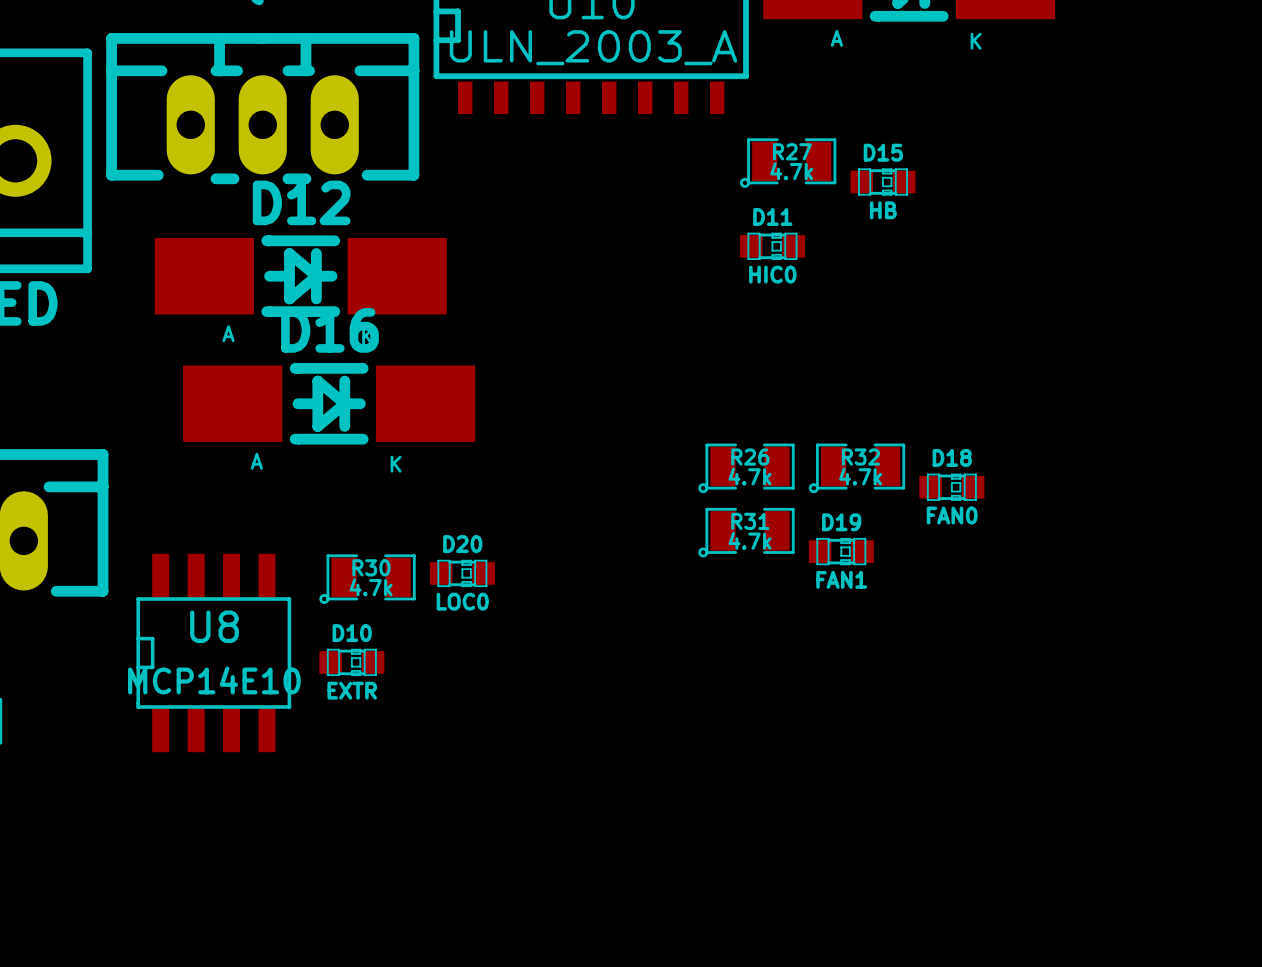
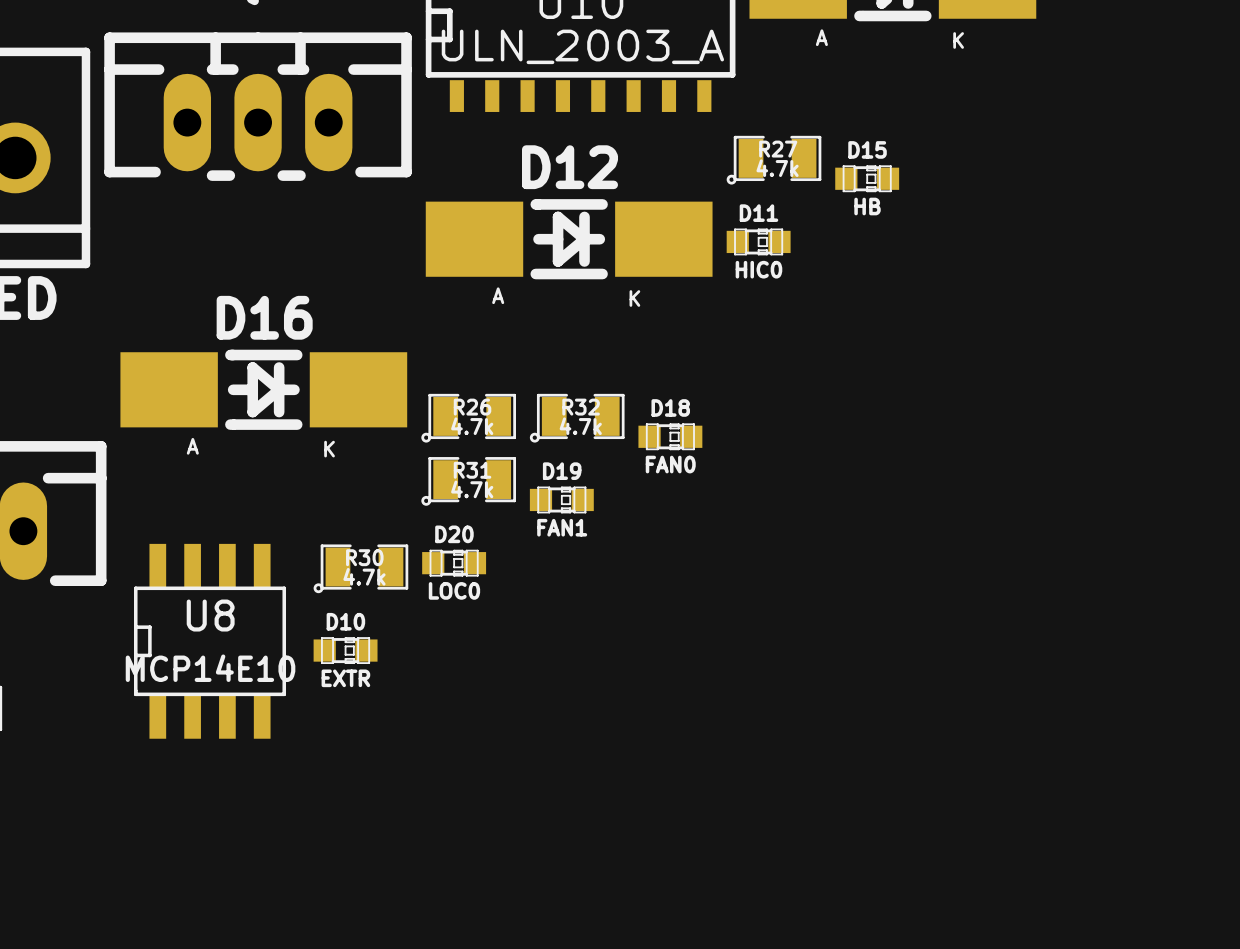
D12 position: (300, 276) -> (569, 239)
D16 position: (329, 403) -> (263, 389)
R26 position: (746, 468) -> (468, 418)
R32 position: (856, 468) -> (577, 418)
D18 position: (951, 487) -> (670, 436)
R31 position: (746, 532) -> (468, 481)
D19 position: (841, 551) -> (561, 499)

